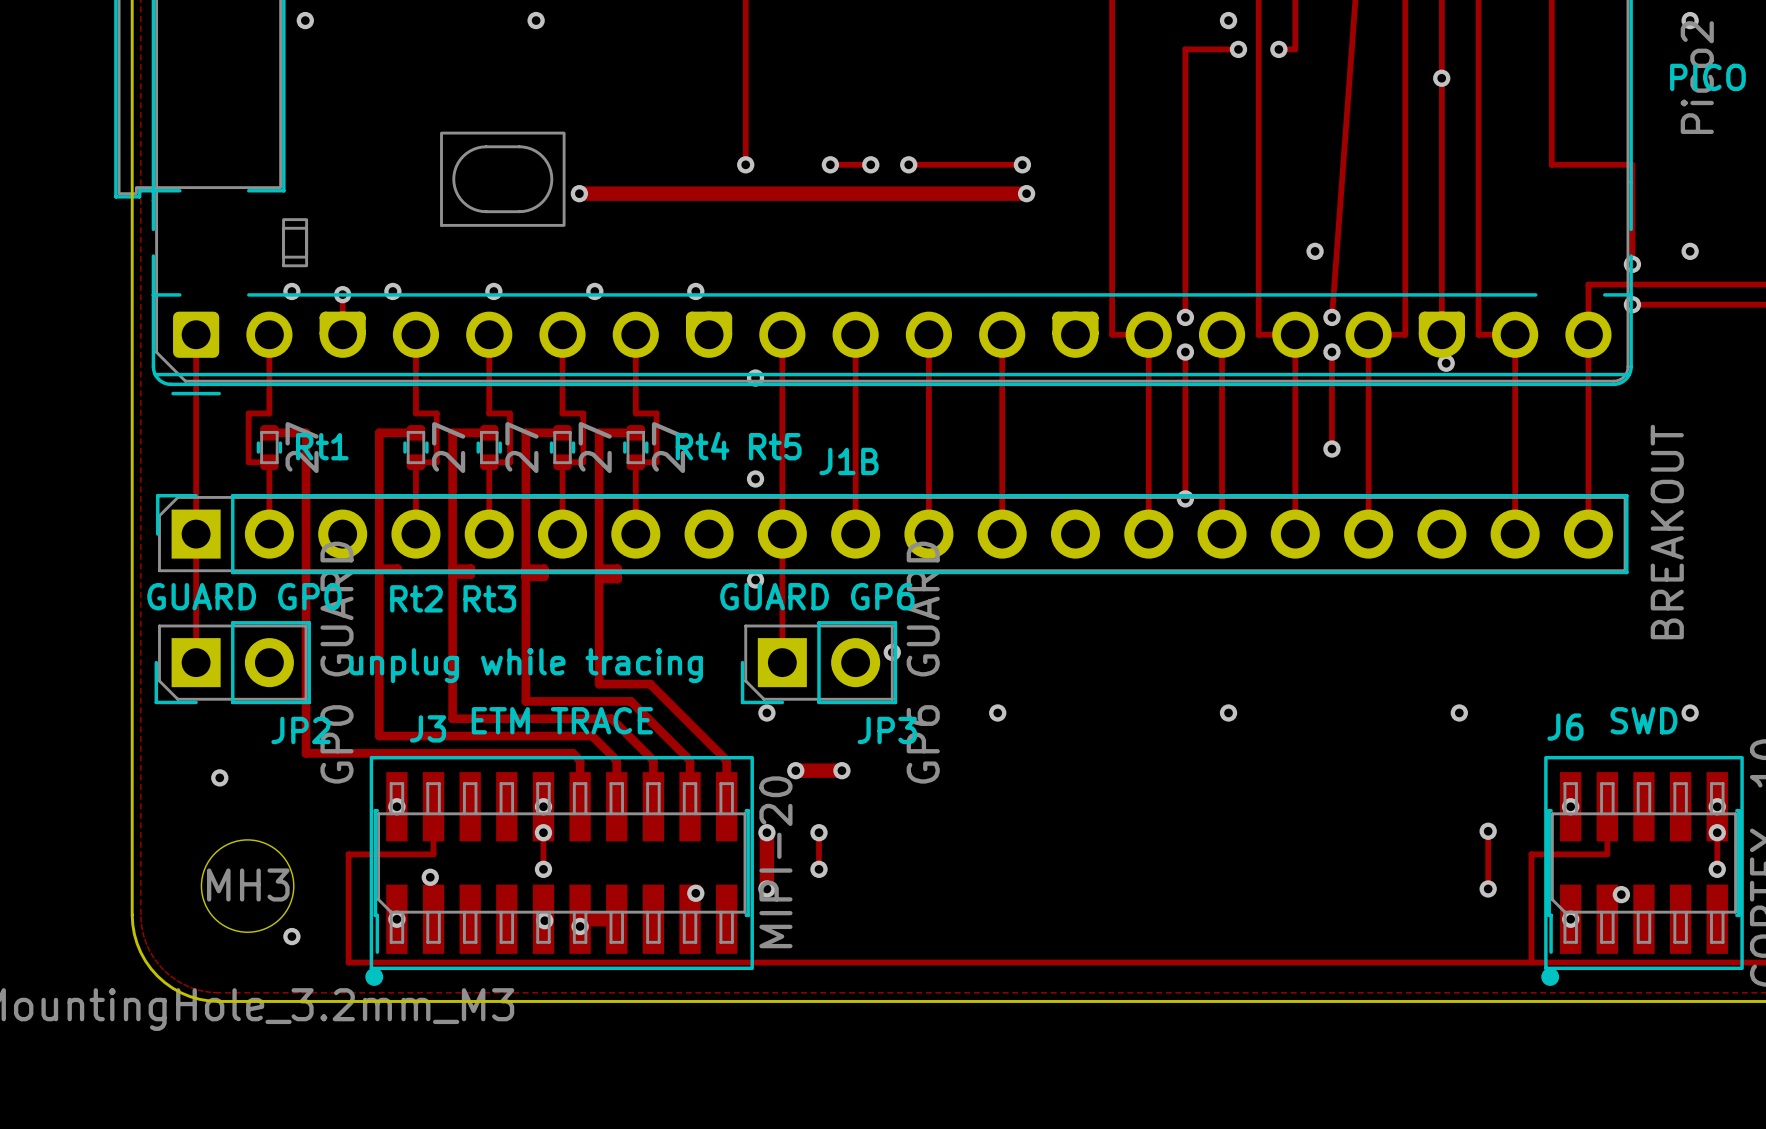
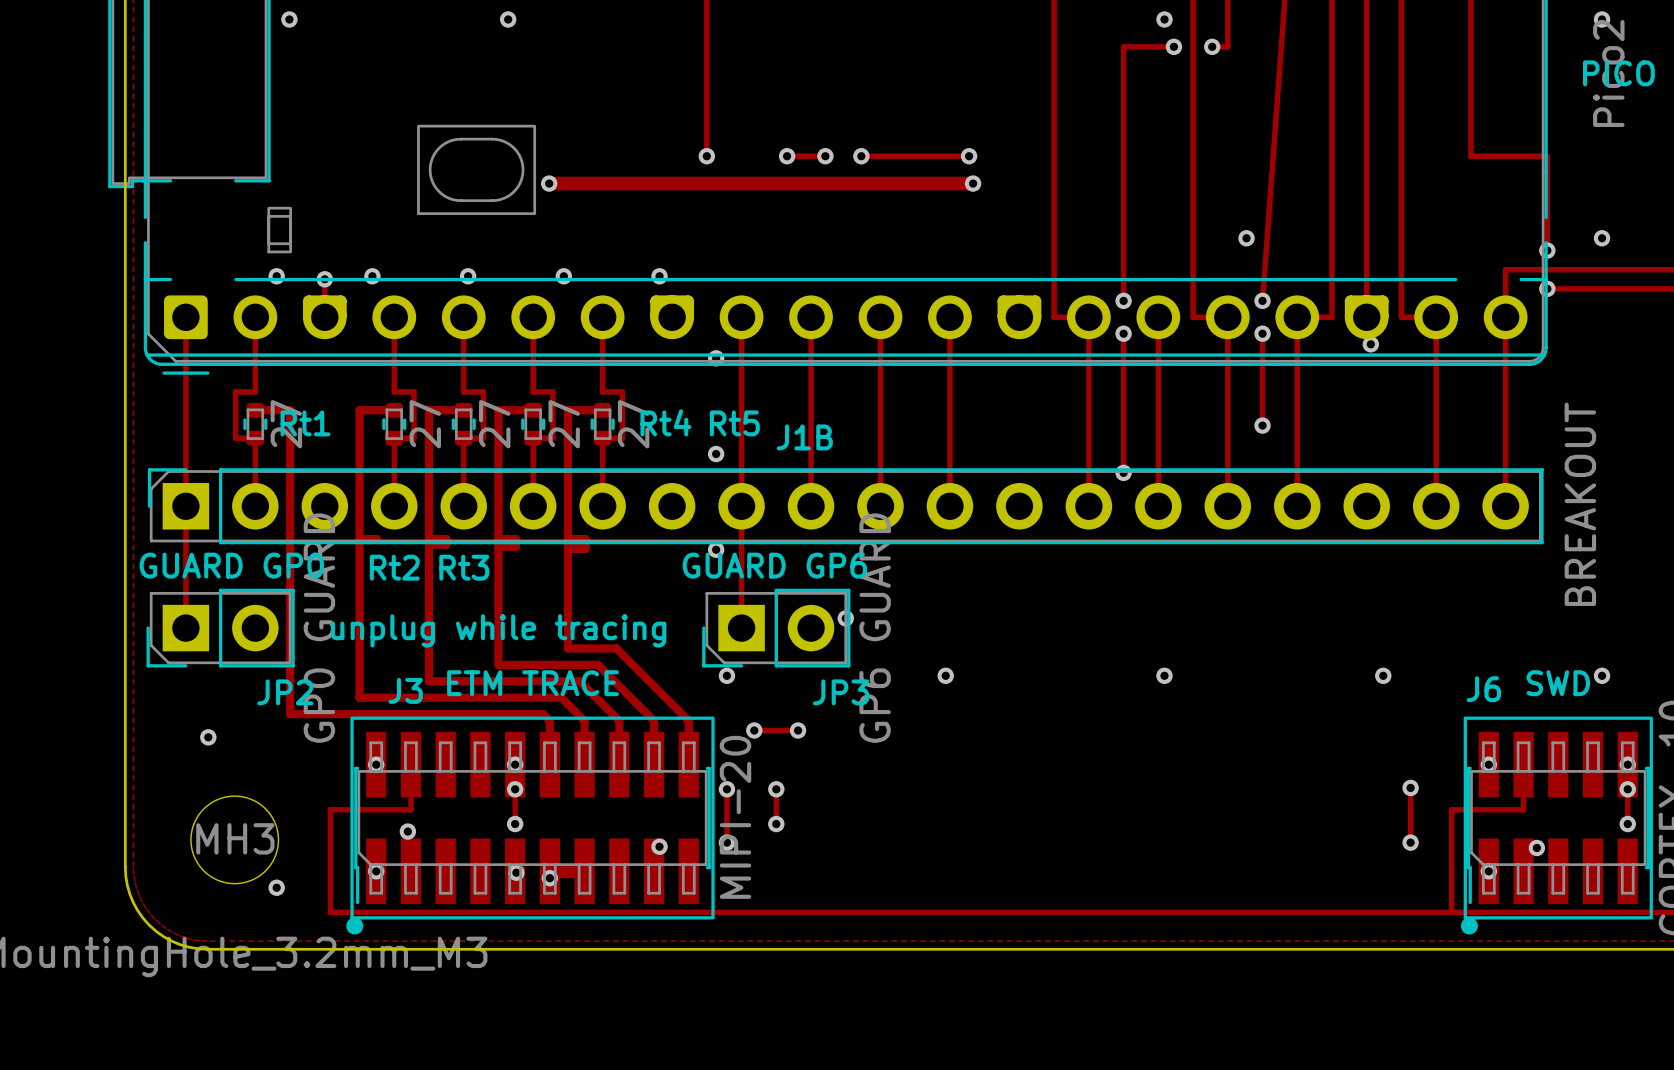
via: (1441, 78) -> none
track width: thick (795, 770) (841, 770) -> thin (754, 730) (798, 730)
track width: thick (766, 832) (766, 888) -> thin (726, 789) (726, 842)

